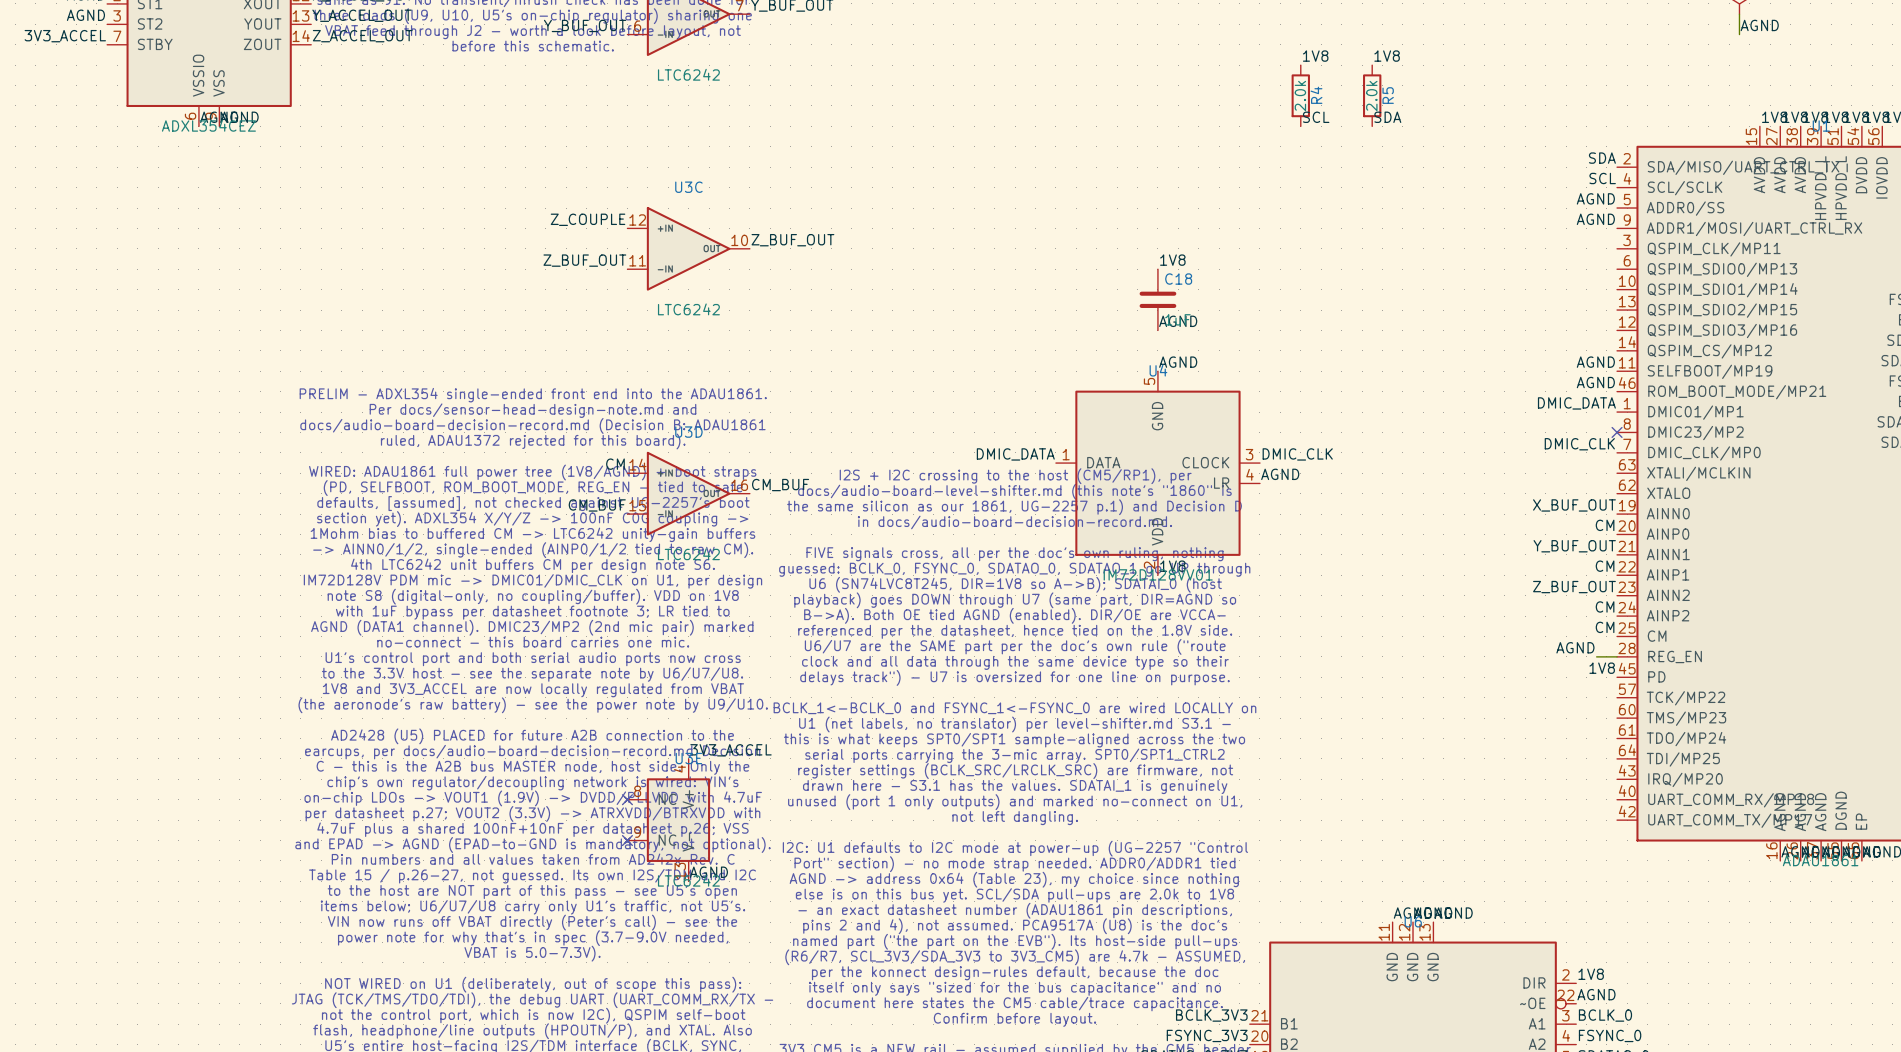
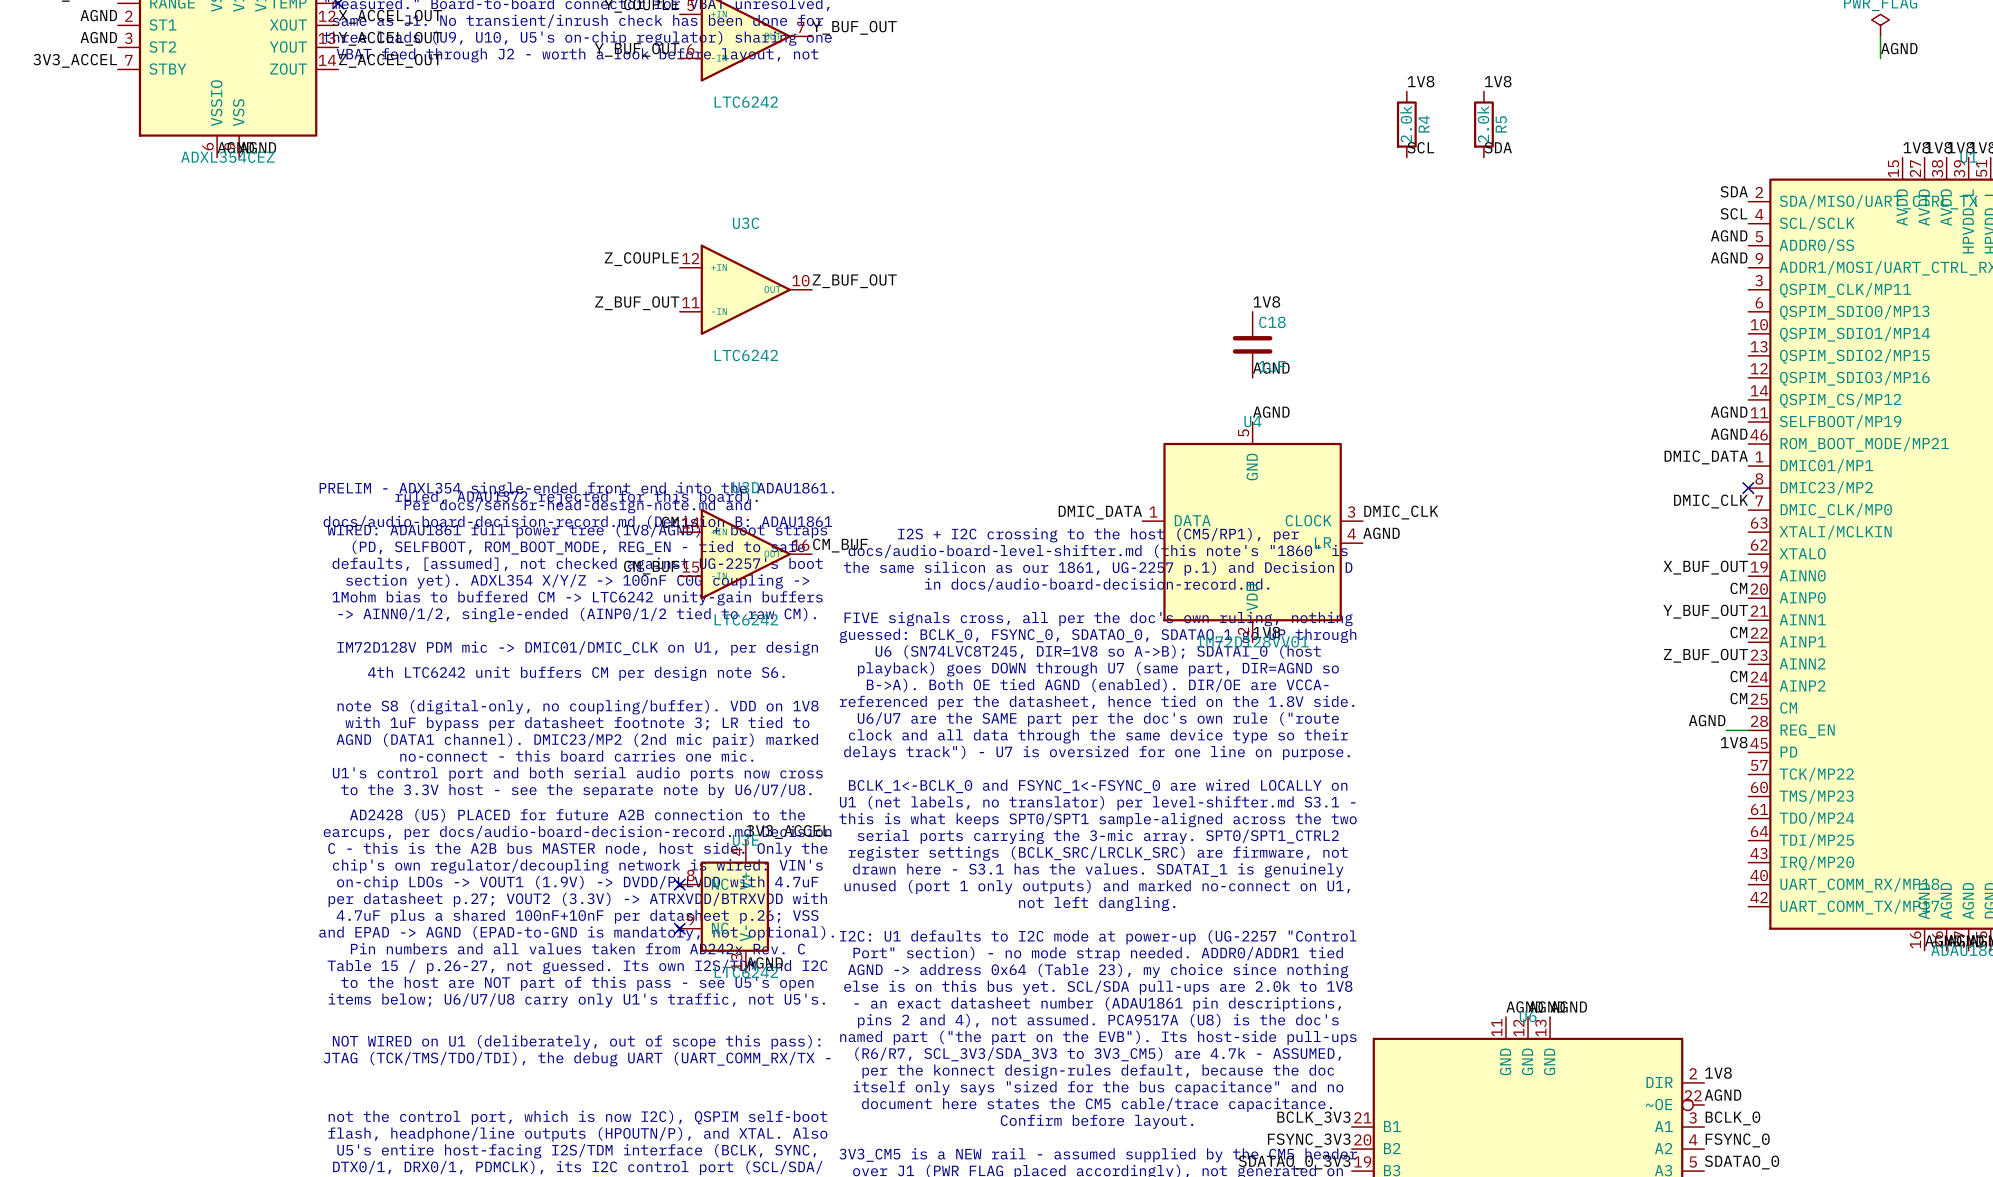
text: before this schematic. (533, 46) -> none
text position: PRELIM - ADXL354 single-ended front end into the ADAU1861. (533, 395) -> PRELIM - ADXL354 single-ended front end into the ADAU1861. (576, 489)
text position: Per docs/sensor-head-design-note.md and (532, 410) -> Per docs/sensor-head-design-note.md and (577, 506)
text position: docs/audio-board-decision-record.md (Decision B: ADAU1861 (532, 425) -> docs/audio-board-decision-record.md (Decision B: ADAU1861 (577, 522)
text position: 4th LTC6242 unit buffers CM per design note S6. (532, 565) -> 4th LTC6242 unit buffers CM per design note S6. (576, 673)
text position: note S8 (digital-only, no coupling/buffer). VDD on 1V8 (533, 596) -> note S8 (digital-only, no coupling/buffer). VDD on 1V8 (578, 707)
text position: with 1uF bypass per datasheet footnote 3; LR tied to (532, 612) -> with 1uF bypass per datasheet footnote 3; LR tied to (577, 723)
text position: AGND (DATA1 channel). DMIC23/MP2 (2nd mic pair) marked (532, 627) -> AGND (DATA1 channel). DMIC23/MP2 (2nd mic pair) marked (577, 740)
text position: no-connect - this board carries one mic. (533, 642) -> no-connect - this board carries one mic. (576, 756)
text position: U1's control port and both serial audio ports now cross (533, 659) -> U1's control port and both serial audio ports now cross (577, 774)
text position: to the 3.3V host - see the separate note by U6/U7/U8. (532, 674) -> to the 3.3V host - see the separate note by U6/U7/U8. (576, 790)
text: 1V8 and 3V3_ACCEL are now locally regulated from VBAT (533, 690) -> none
text: (the aeronode's raw battery) - see the power note by U9/U10. (533, 705) -> none
text: VIN now runs off VBAT directly (Peter's call) - see the (532, 922) -> none
text: power note for why that's in spec (3.7-9.0V needed, (533, 938) -> none
text: VBAT is 5.0-7.3V). (532, 953) -> none
text position: NOT WIRED on U1 (deliberately, out of scope this pass): (533, 984) -> NOT WIRED on U1 (deliberately, out of scope this pass): (576, 1042)
text position: JTAG (TCK/TMS/TDO/TDI), the debug UART (UART_COMM_RX/TX - (532, 1000) -> JTAG (TCK/TMS/TDO/TDI), the debug UART (UART_COMM_RX/TX - (577, 1059)

